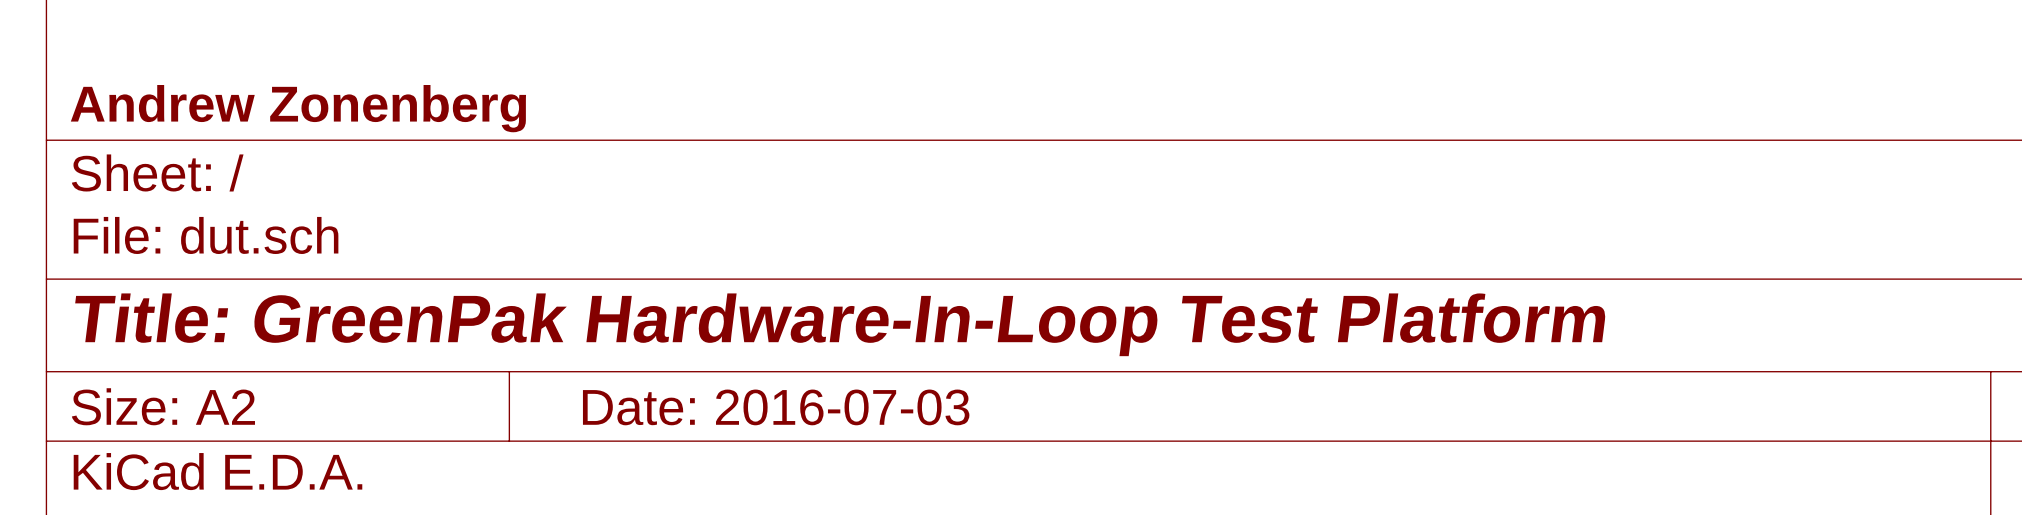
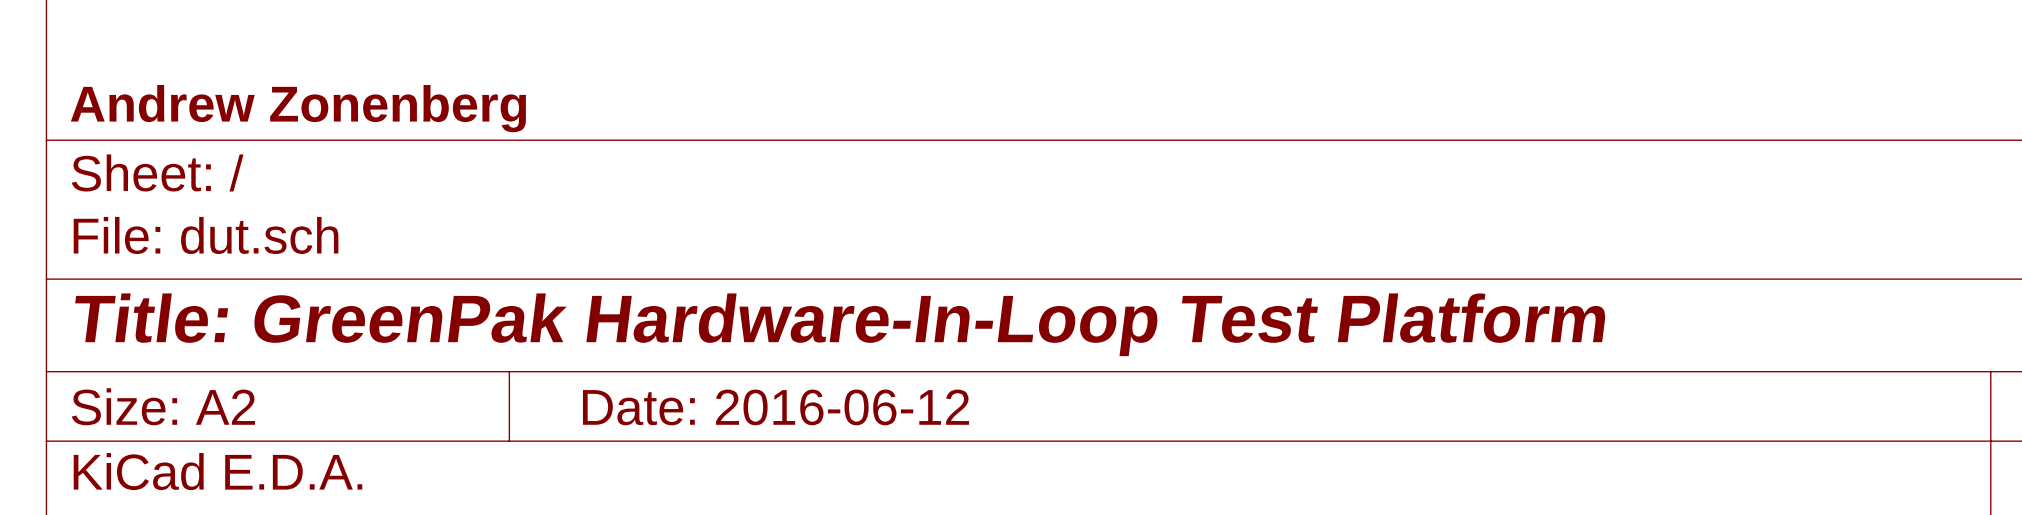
title block: Date: 2016-07-03 (776, 407) -> Date: 2016-06-12 (776, 407)

